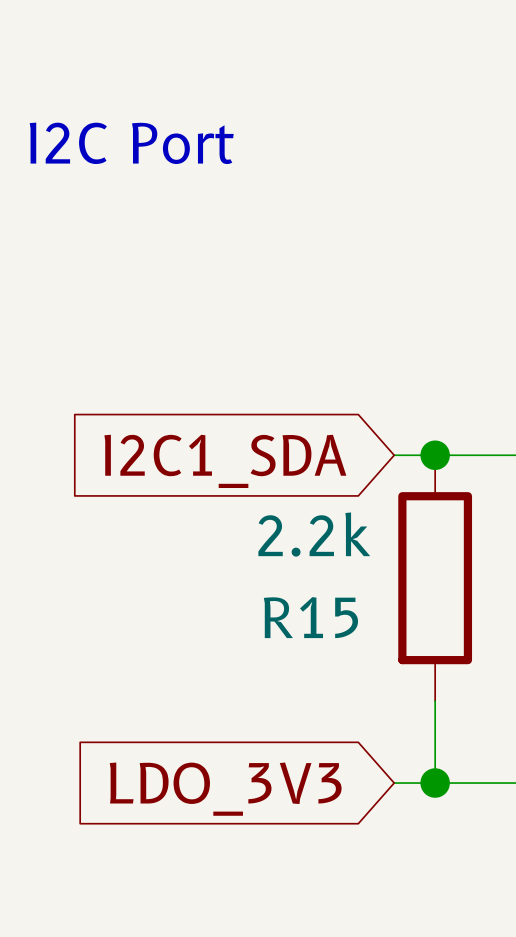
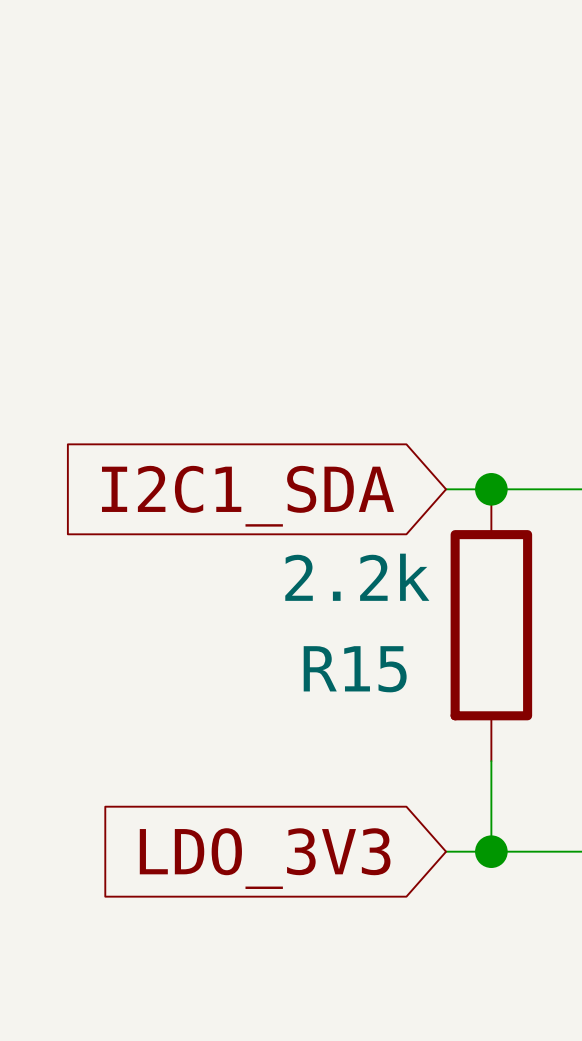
text: I2C Port (131, 143) -> none

